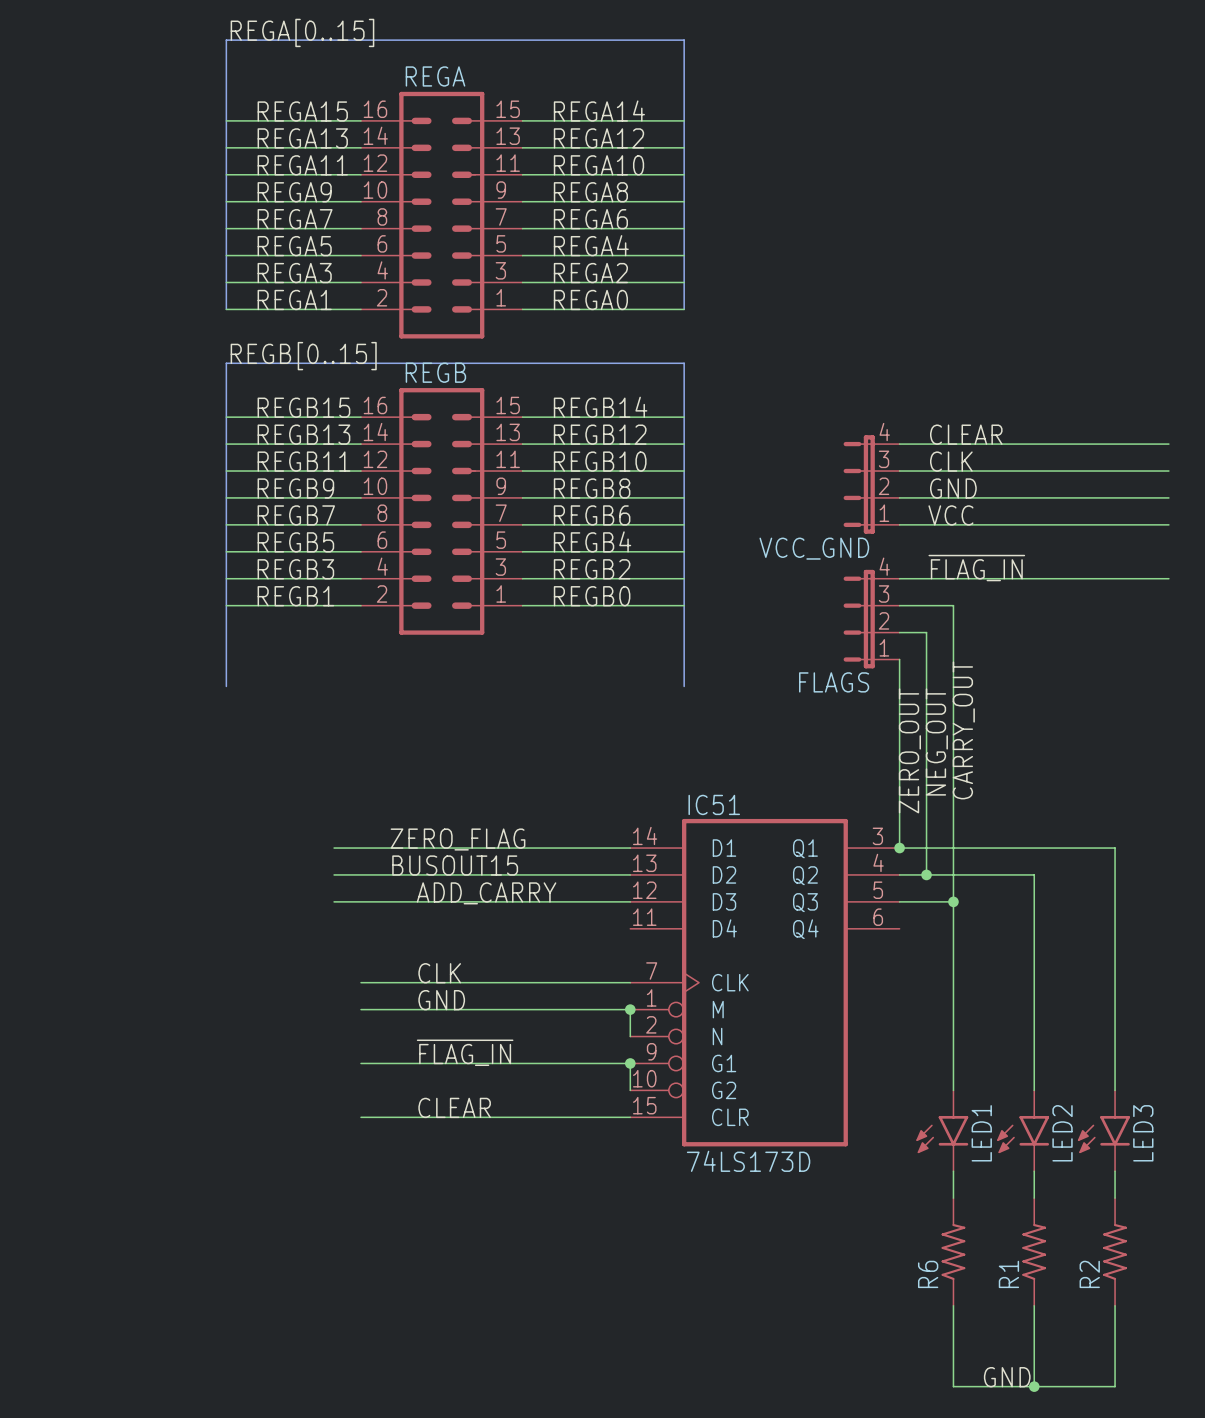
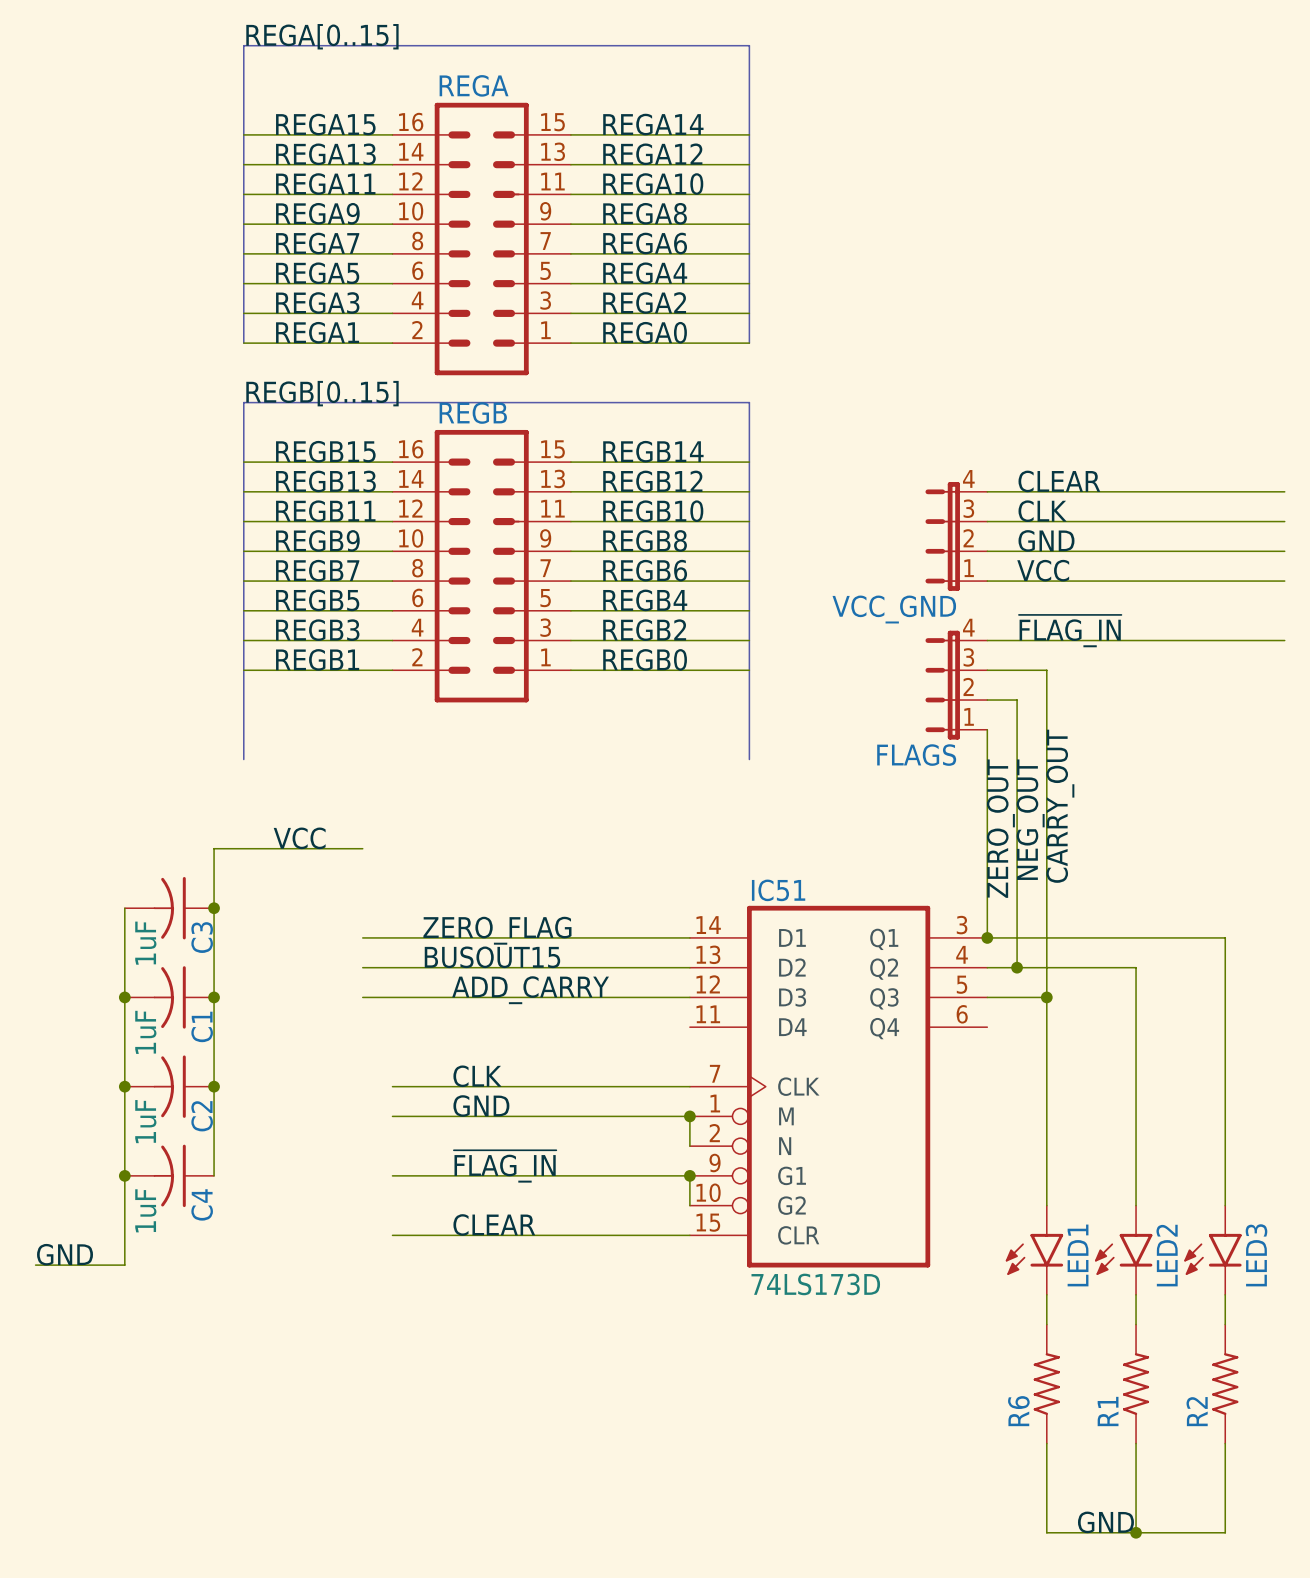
label: none -> VCC (299, 838)
wire: none -> (362, 848) (214, 848) (214, 1175)
wire: none -> (124, 908) (124, 1265) (35, 1265)
C3: none -> 1uF (169, 908)
junction: none -> (214, 908)
junction: none -> (124, 997)
C1: none -> 1uF (169, 997)
junction: none -> (214, 997)
junction: none -> (124, 1086)
C2: none -> 1uF (169, 1086)
junction: none -> (214, 1086)
junction: none -> (124, 1175)
C4: none -> 1uF (169, 1175)
label: none -> GND (65, 1254)

